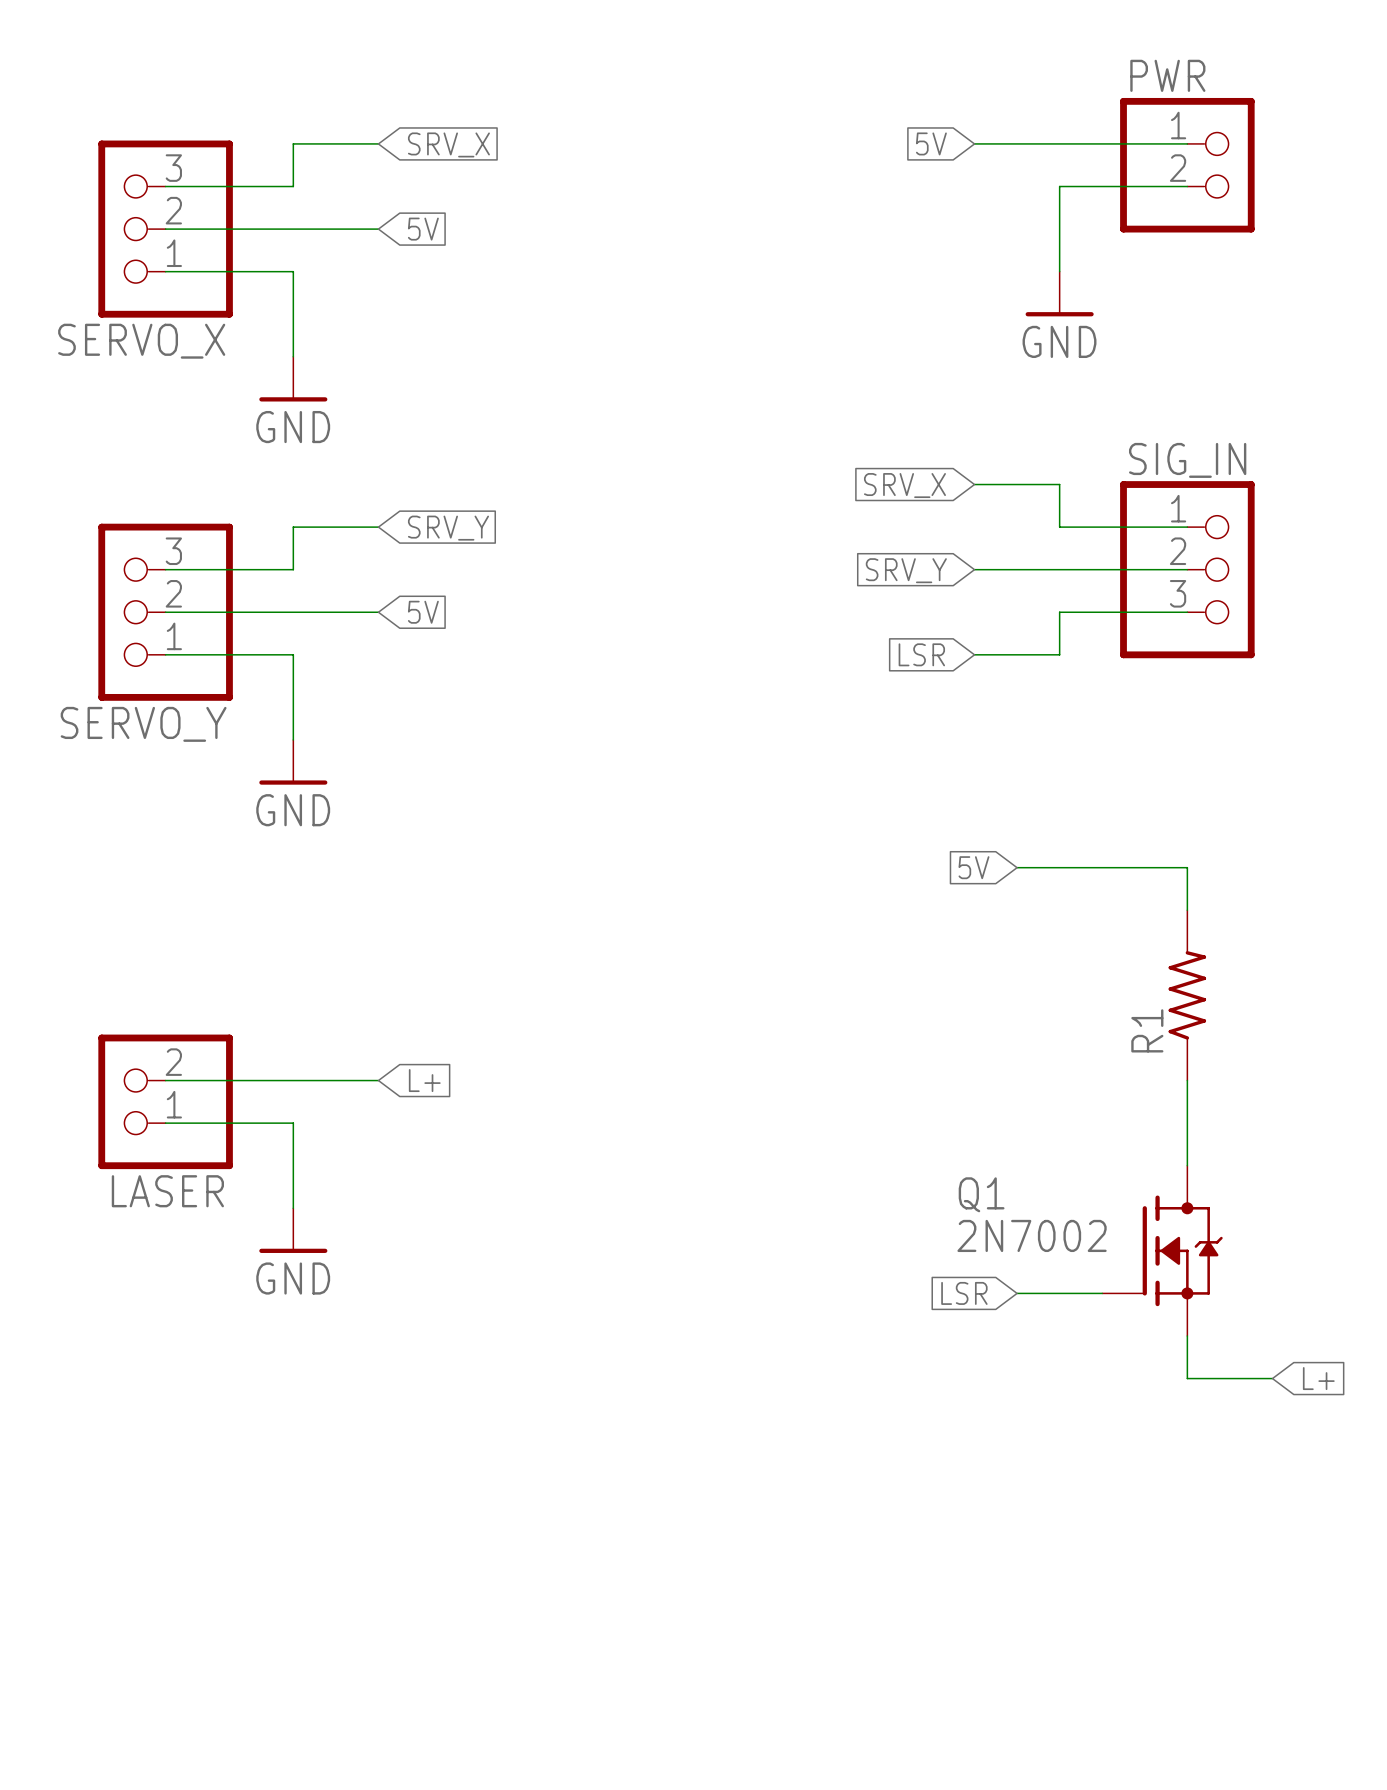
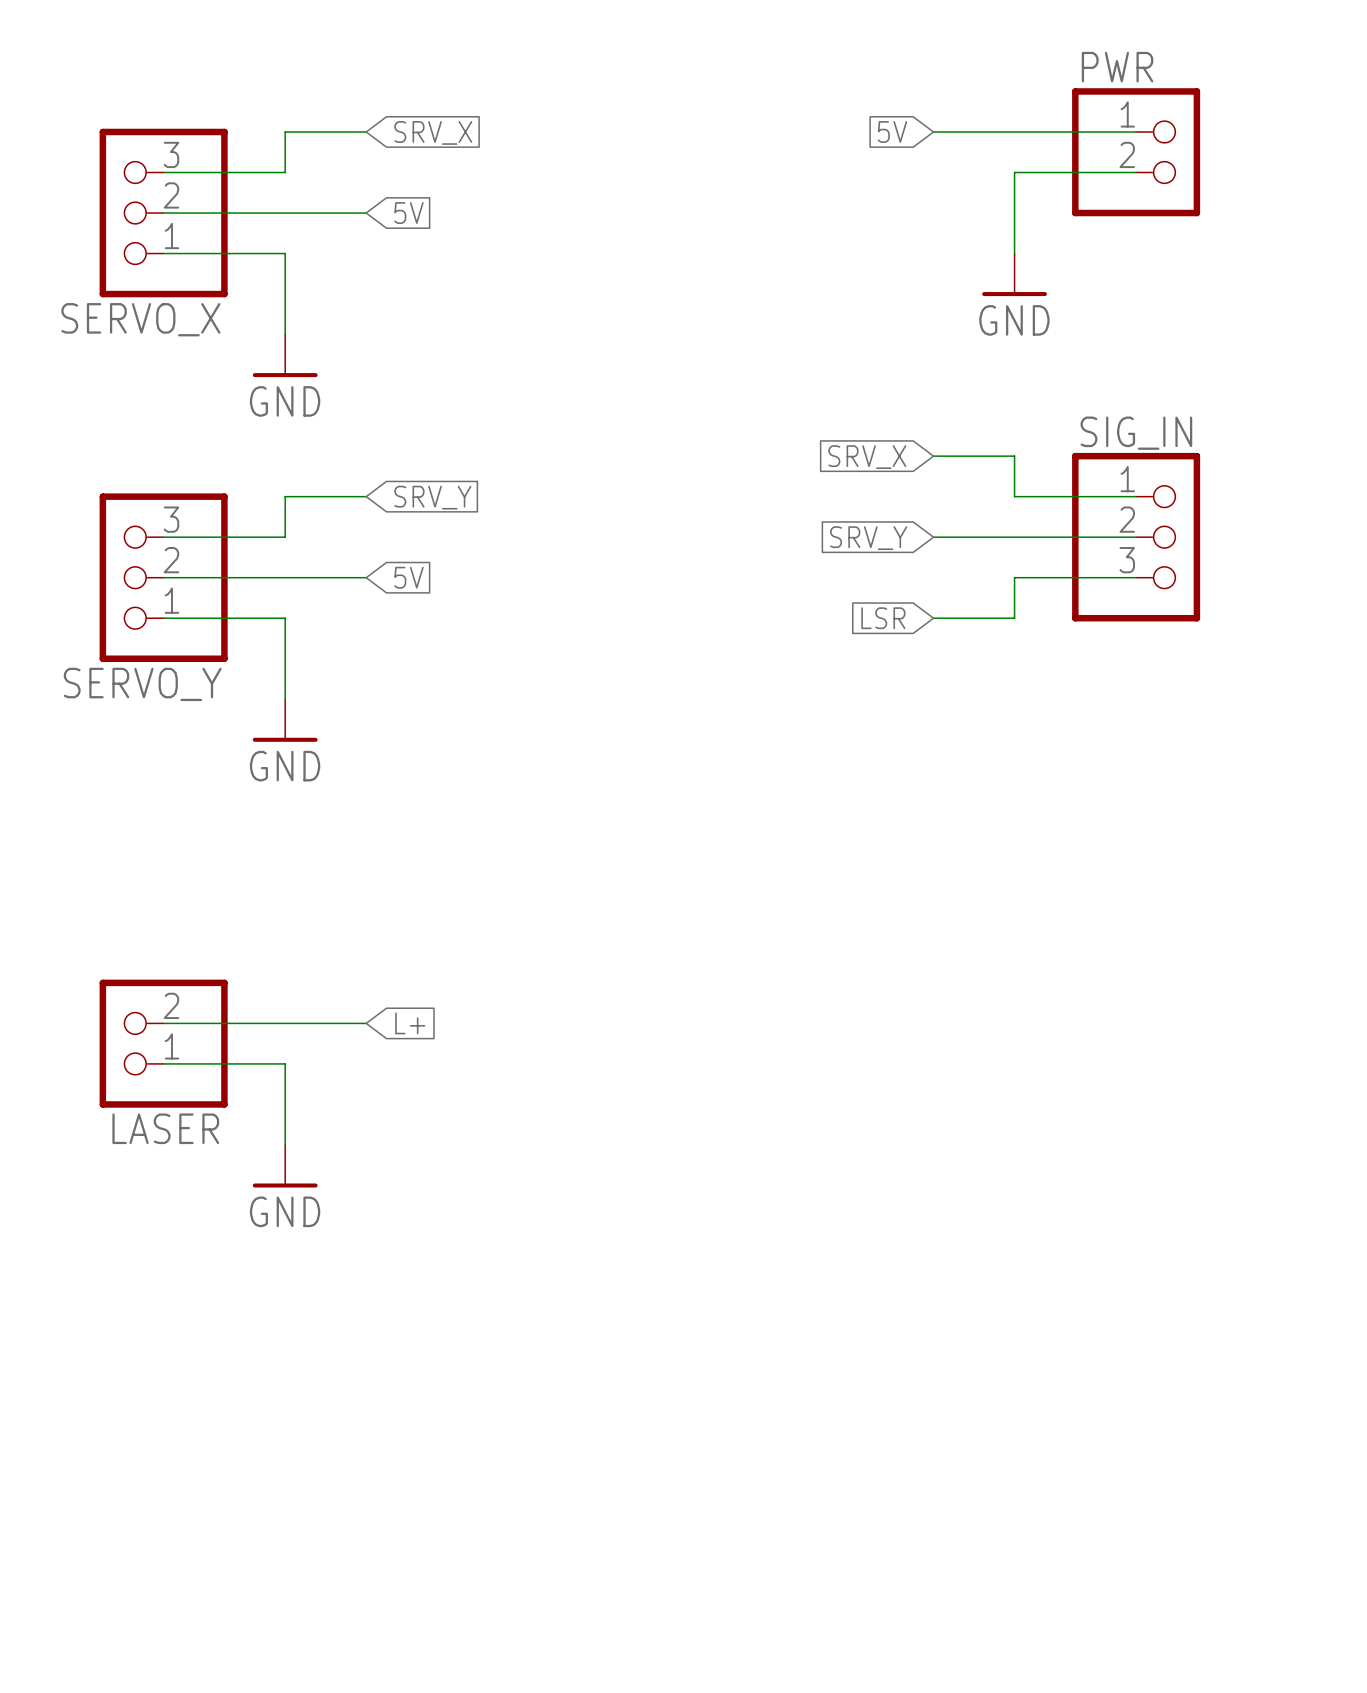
global label: 5V (973, 867) -> none
wire: (1017, 867) (1187, 867) (1187, 910) -> none
R1: (1187, 995) -> none
wire: (1187, 1080) (1187, 1165) -> none
Q1: 2N7002 (1162, 1250) -> none
global label: LSR (964, 1293) -> none
wire: (1017, 1293) (1102, 1293) -> none
wire: (1187, 1335) (1187, 1378) (1272, 1378) -> none
global label: L+ (1318, 1378) -> none

